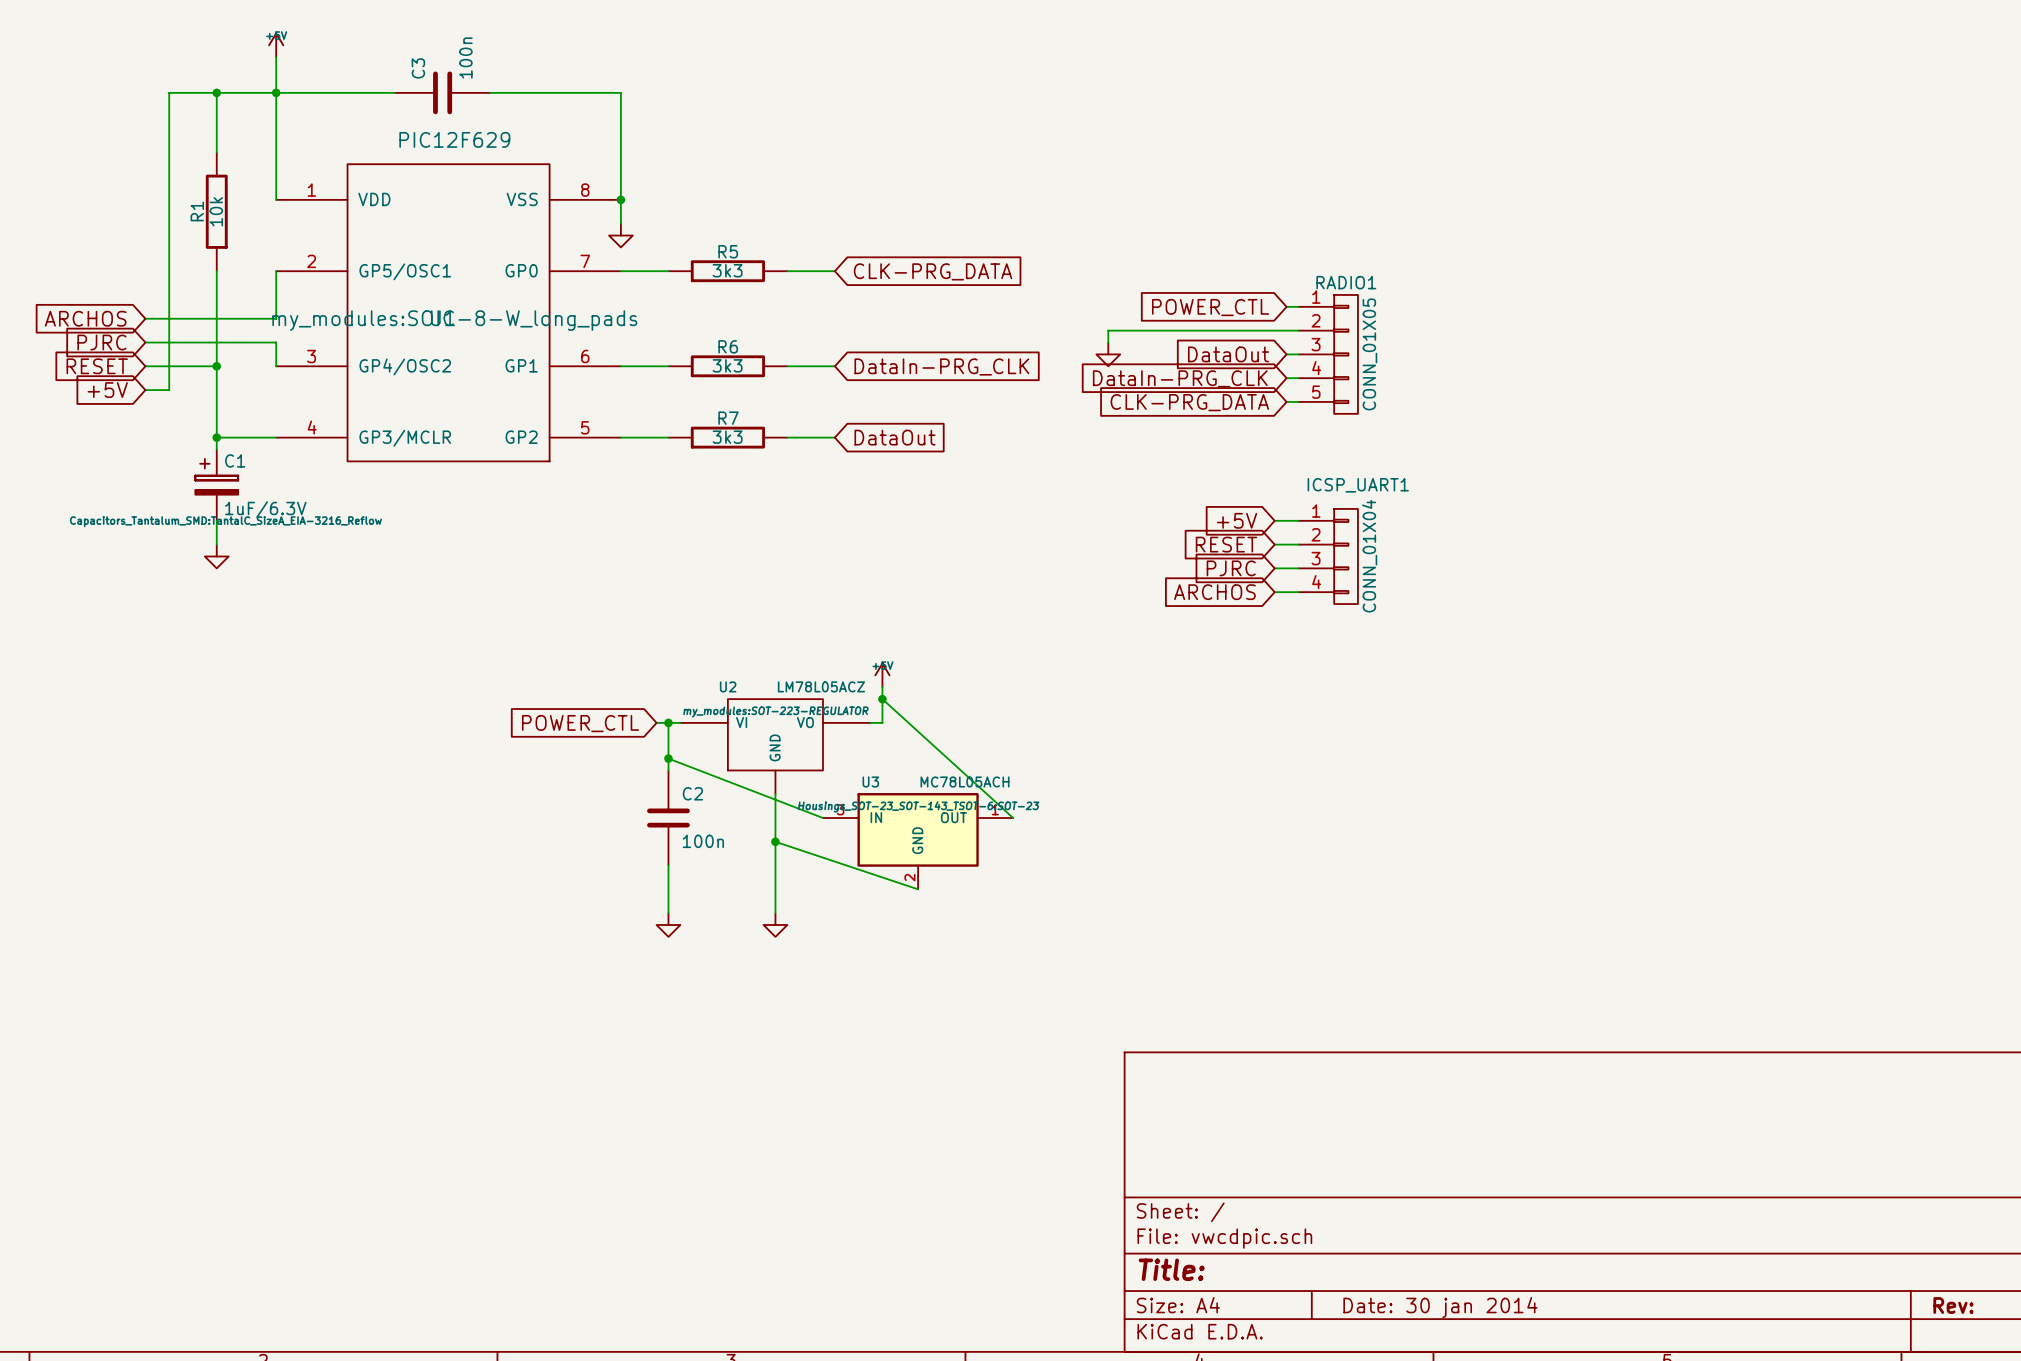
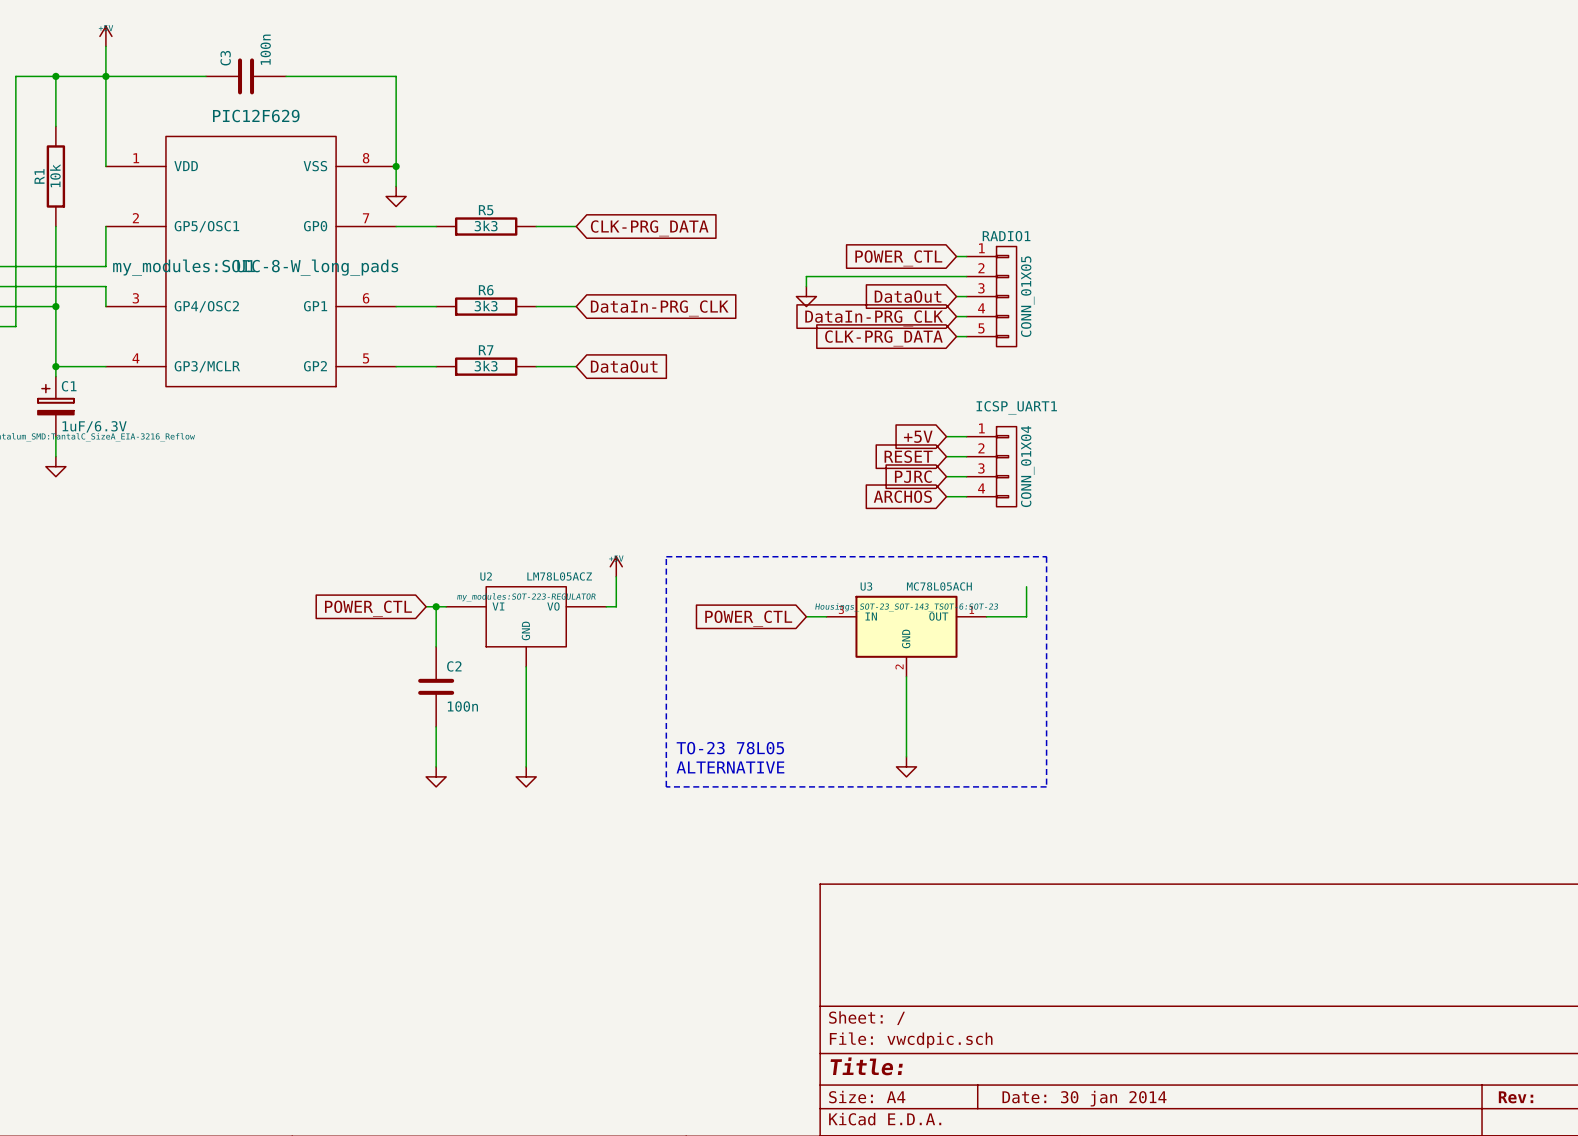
line: none -> (666, 556) (1046, 556) (1046, 786) (666, 786) (666, 556)
wire: (882, 699) (1013, 818) -> none
junction: (882, 699) -> none
wire: none -> (1026, 586) (1026, 616) (986, 616)
wire: none -> (806, 616) (826, 616)
global label: none -> POWER_CTL (748, 618)
wire: (668, 758) (823, 818) -> none
junction: (668, 758) -> none
wire: none -> (906, 676) (906, 756)
wire: (775, 841) (918, 889) -> none
junction: (775, 841) -> none
U3 position: (918, 841) -> (906, 636)
text: none -> TO-23 78L05 (730, 748)
text: none -> ALTERNATIVE (730, 767)
power symbol: none -> (906, 766)

